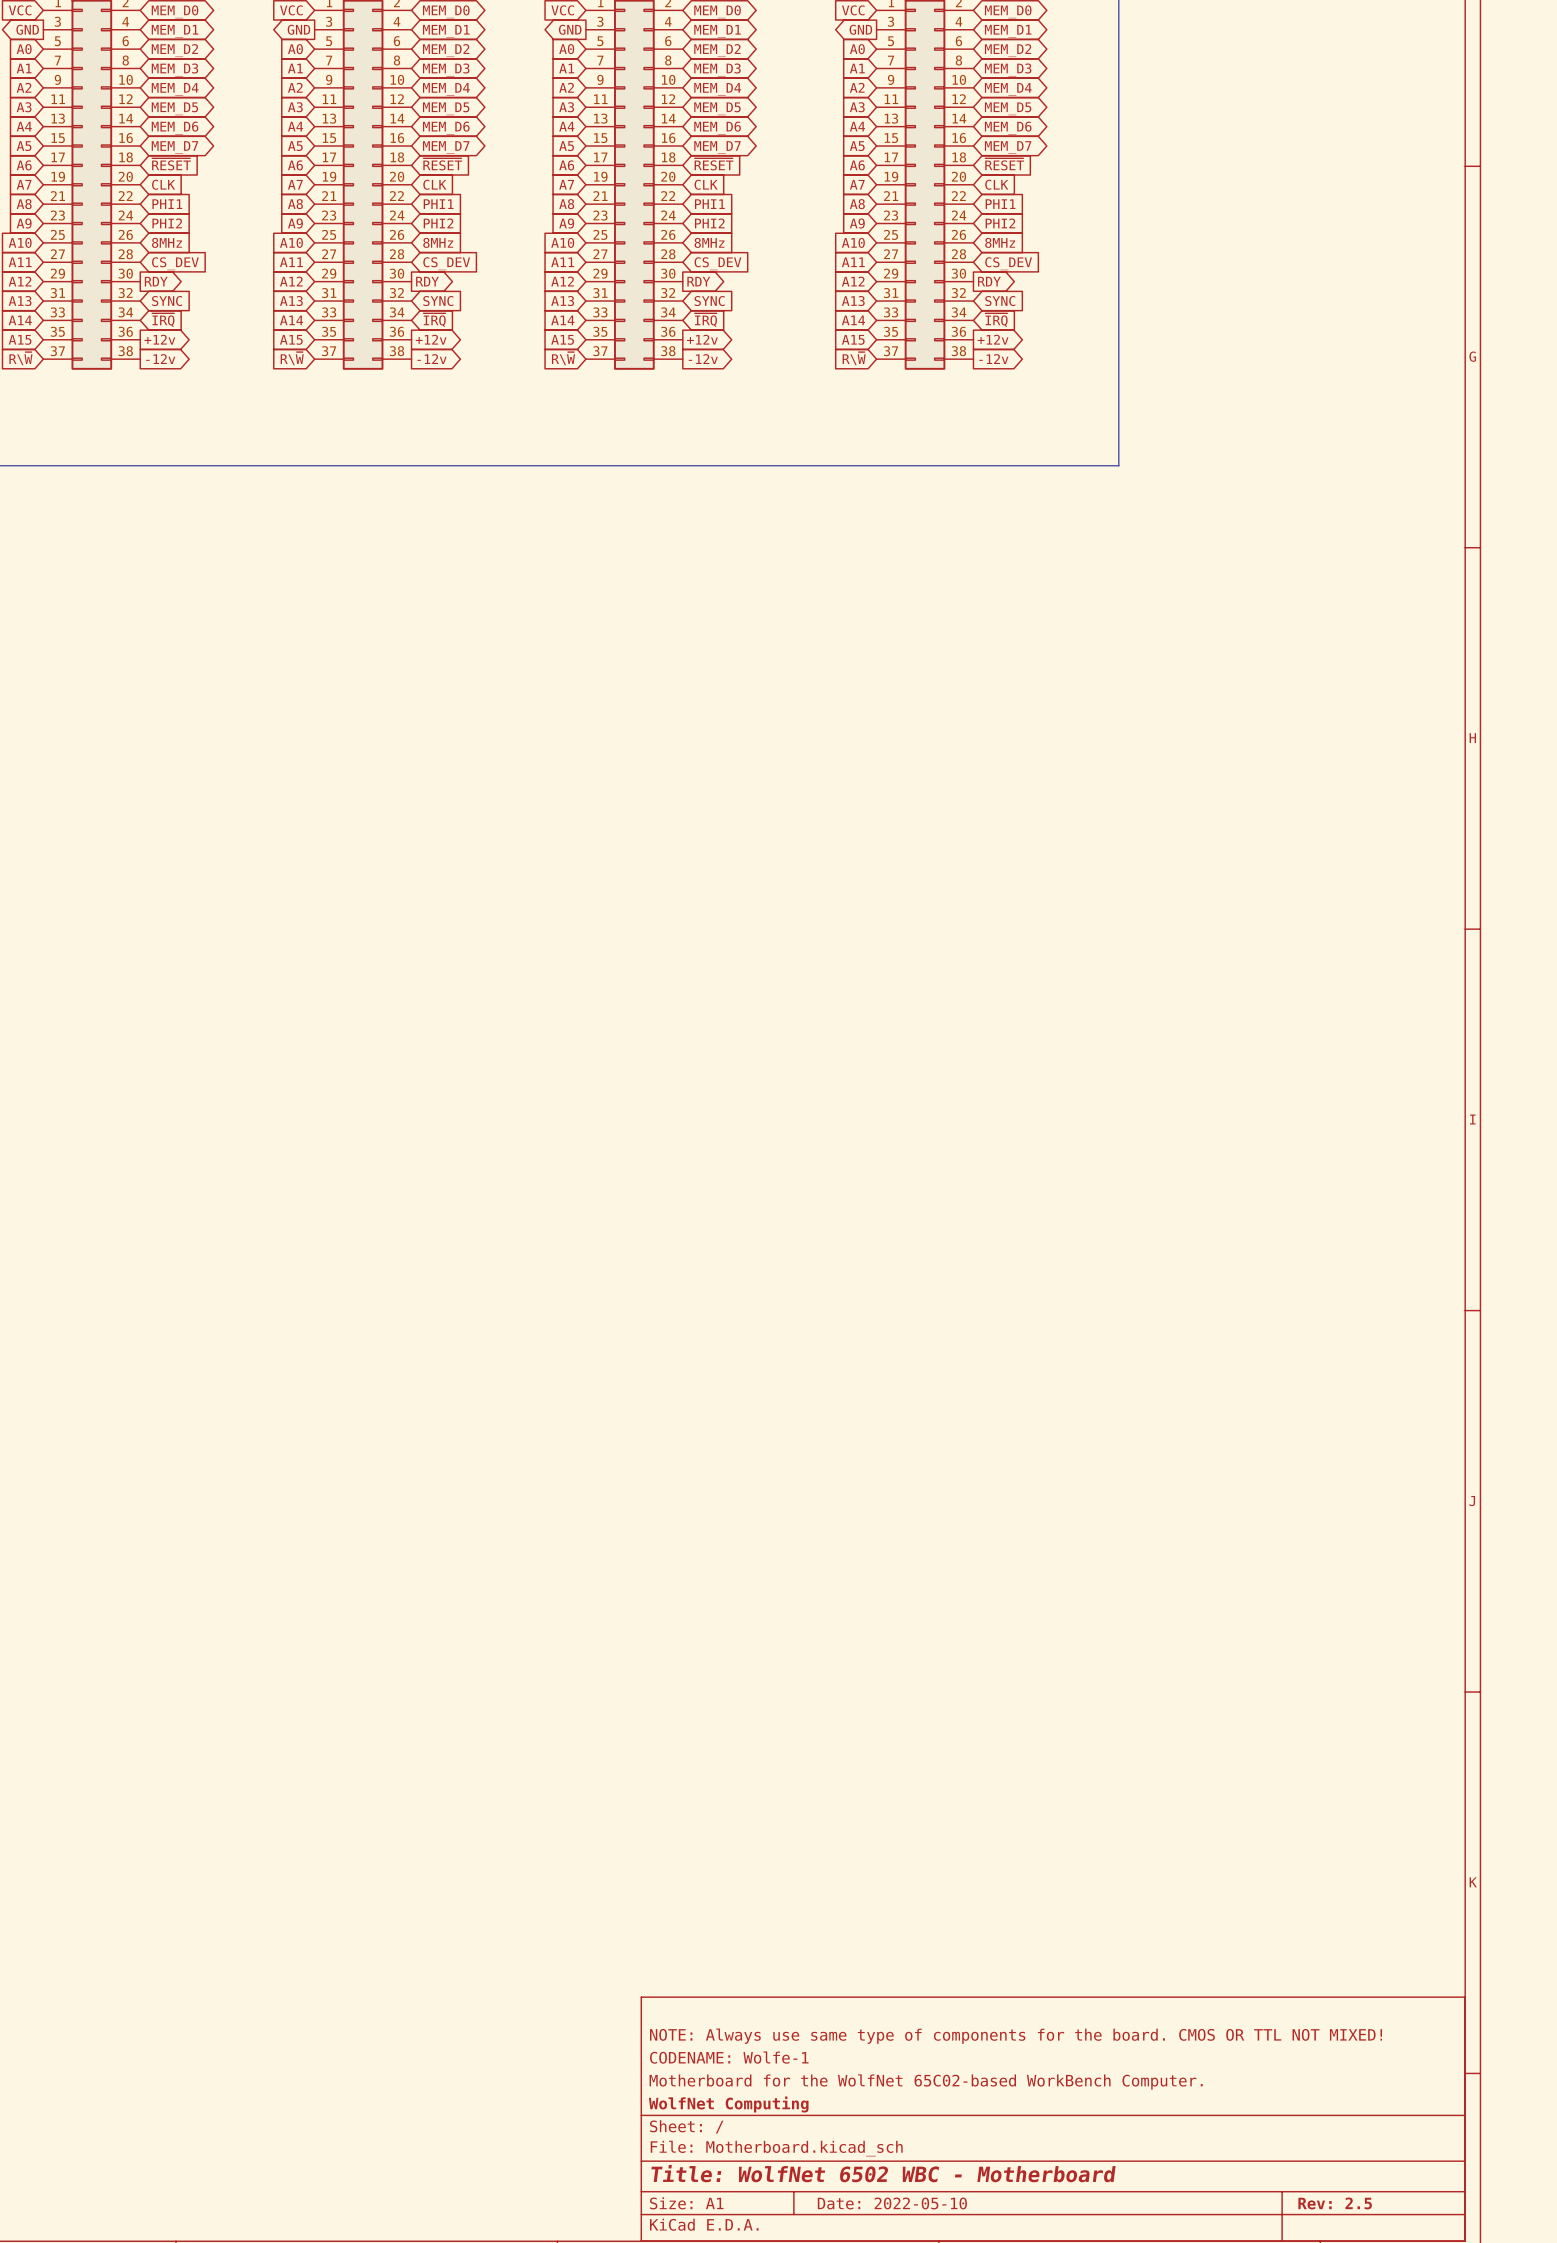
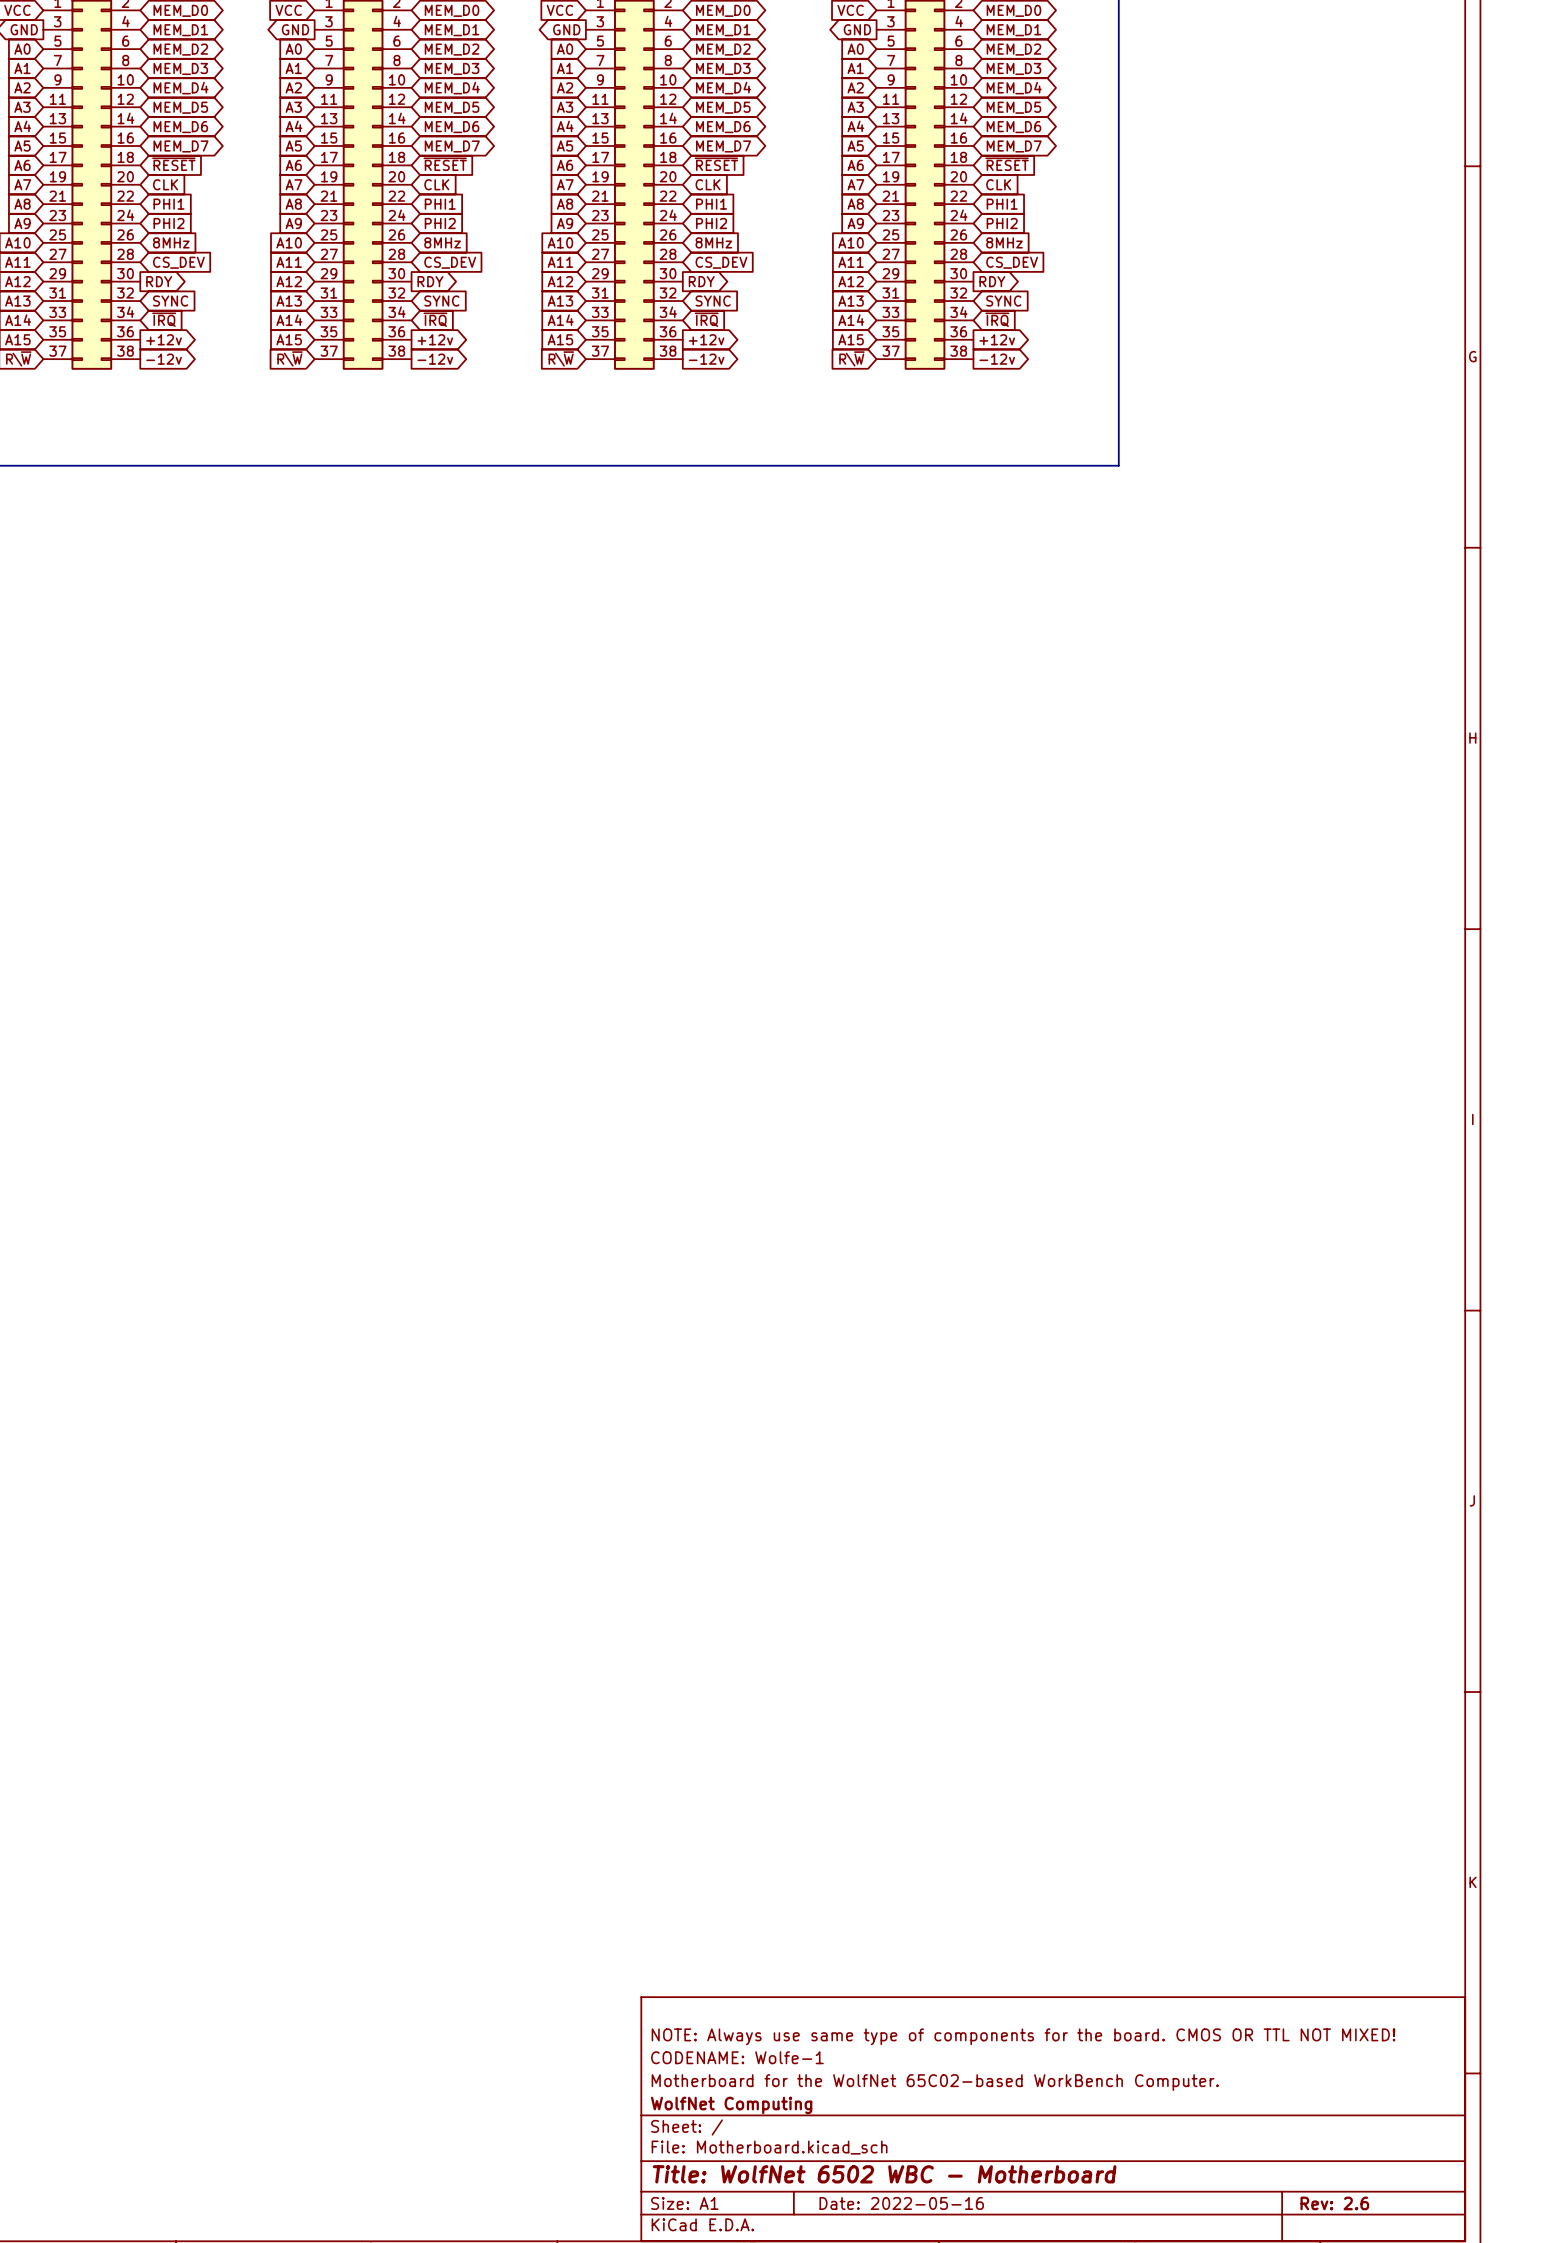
title block: Date: 2022-05-10 (892, 2203) -> Date: 2022-05-16 (901, 2203)
title block: Rev: 2.5 (1335, 2203) -> Rev: 2.6 (1334, 2203)

